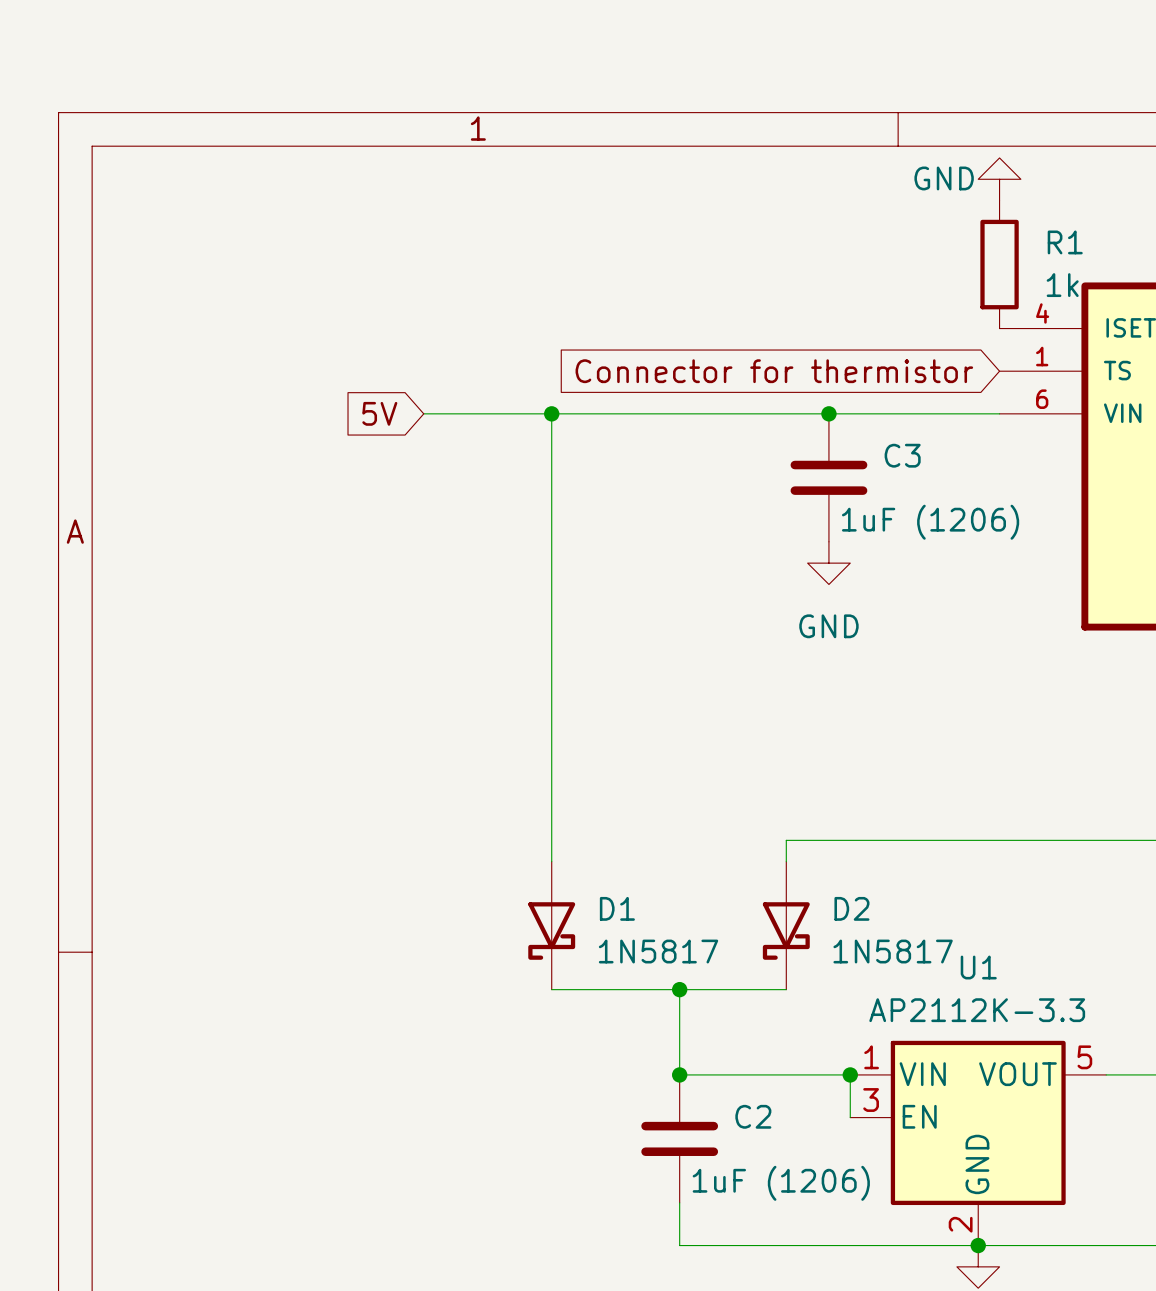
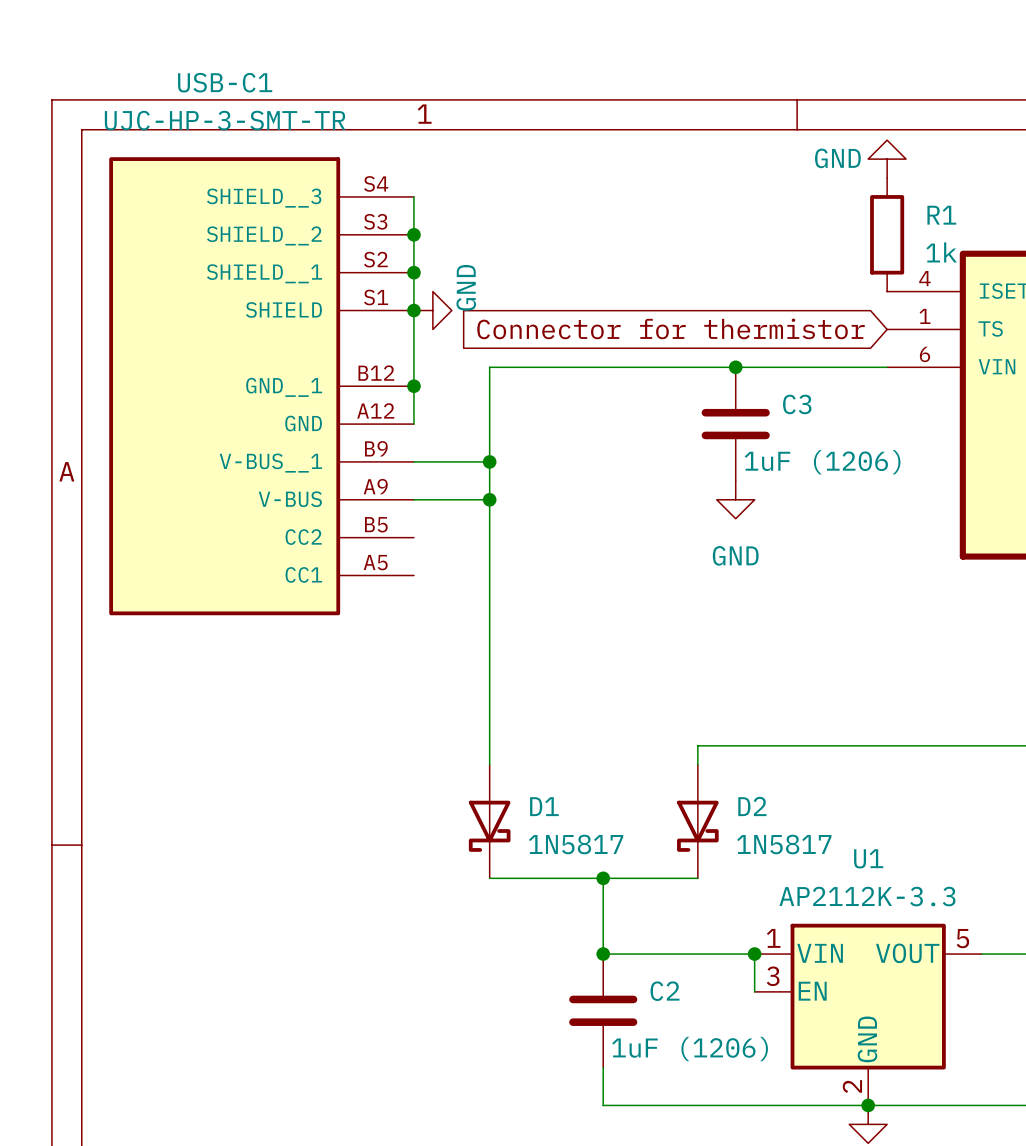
wire: none -> (413, 196) (413, 424)
junction: none -> (413, 234)
junction: none -> (413, 272)
junction: none -> (413, 310)
power symbol: none -> GND (432, 310)
global label: 5V (379, 413) -> none
wire: (423, 413) (551, 413) -> none
junction: (551, 413) -> none
USB-C1: none -> UJC-HP-3-SMT-TR (261, 386)
junction: none -> (413, 386)
wire: none -> (413, 461) (489, 461)
junction: none -> (489, 461)
wire: none -> (413, 499) (489, 499)
junction: none -> (489, 499)

